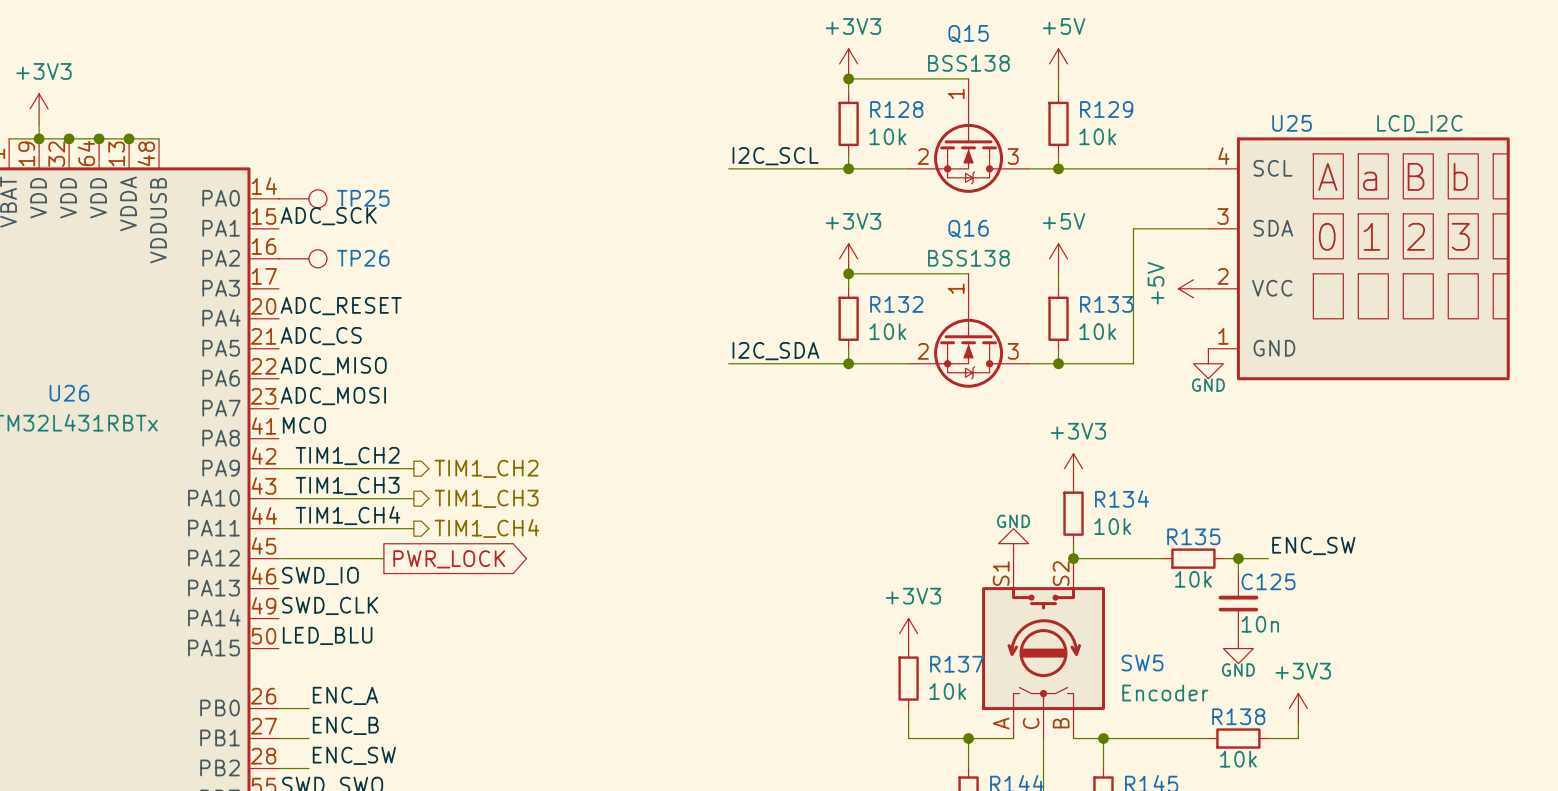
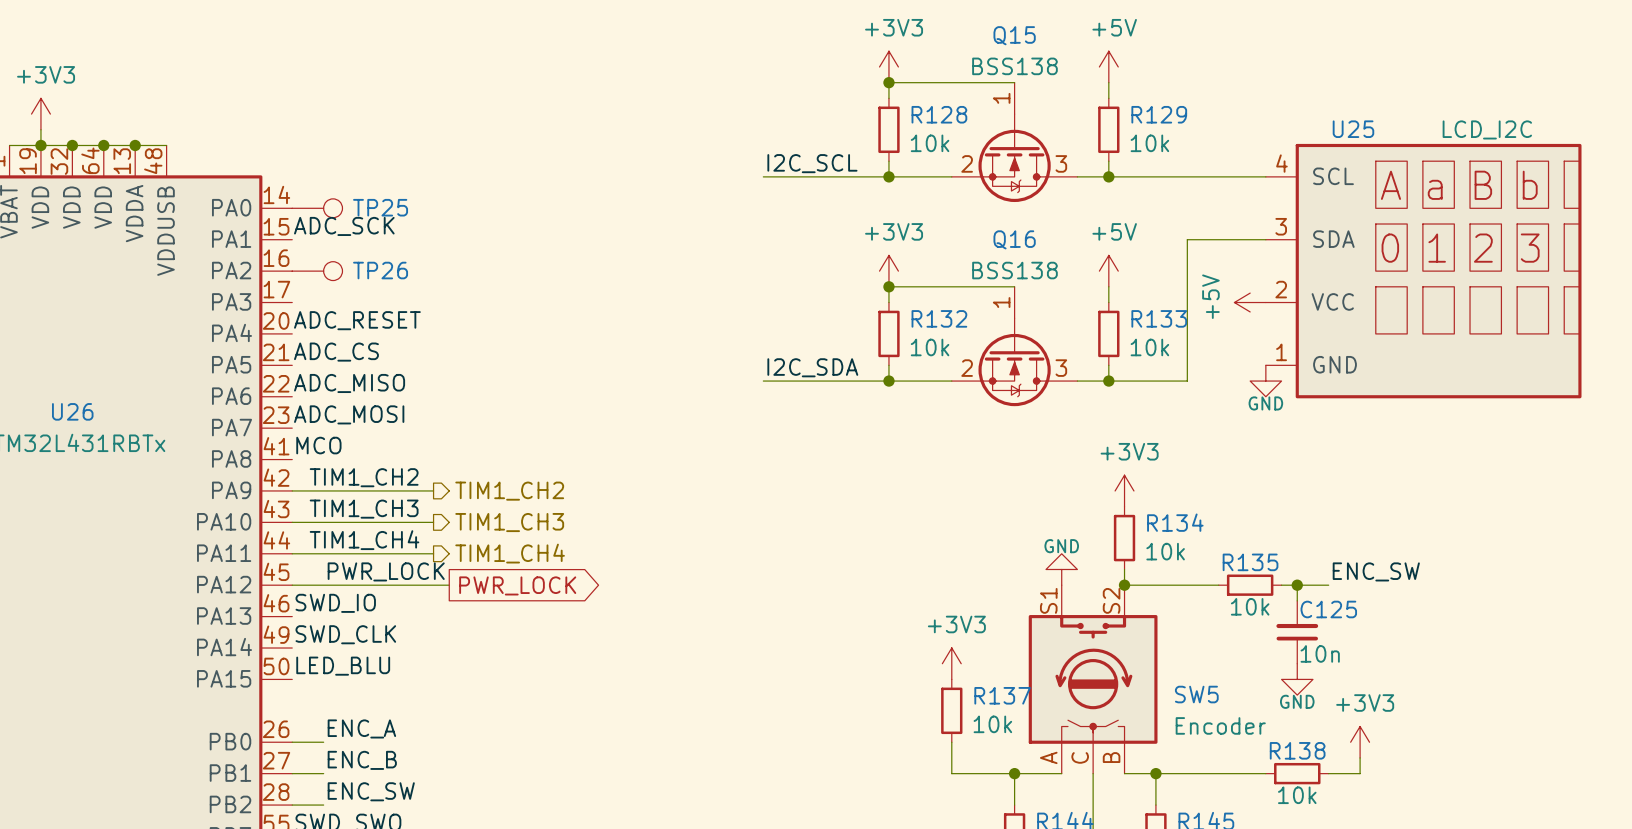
label: none -> PWR_LOCK (386, 571)
wire: none -> (402, 585) (449, 585)
global label position: PWR_LOCK (449, 559) -> PWR_LOCK (517, 585)

